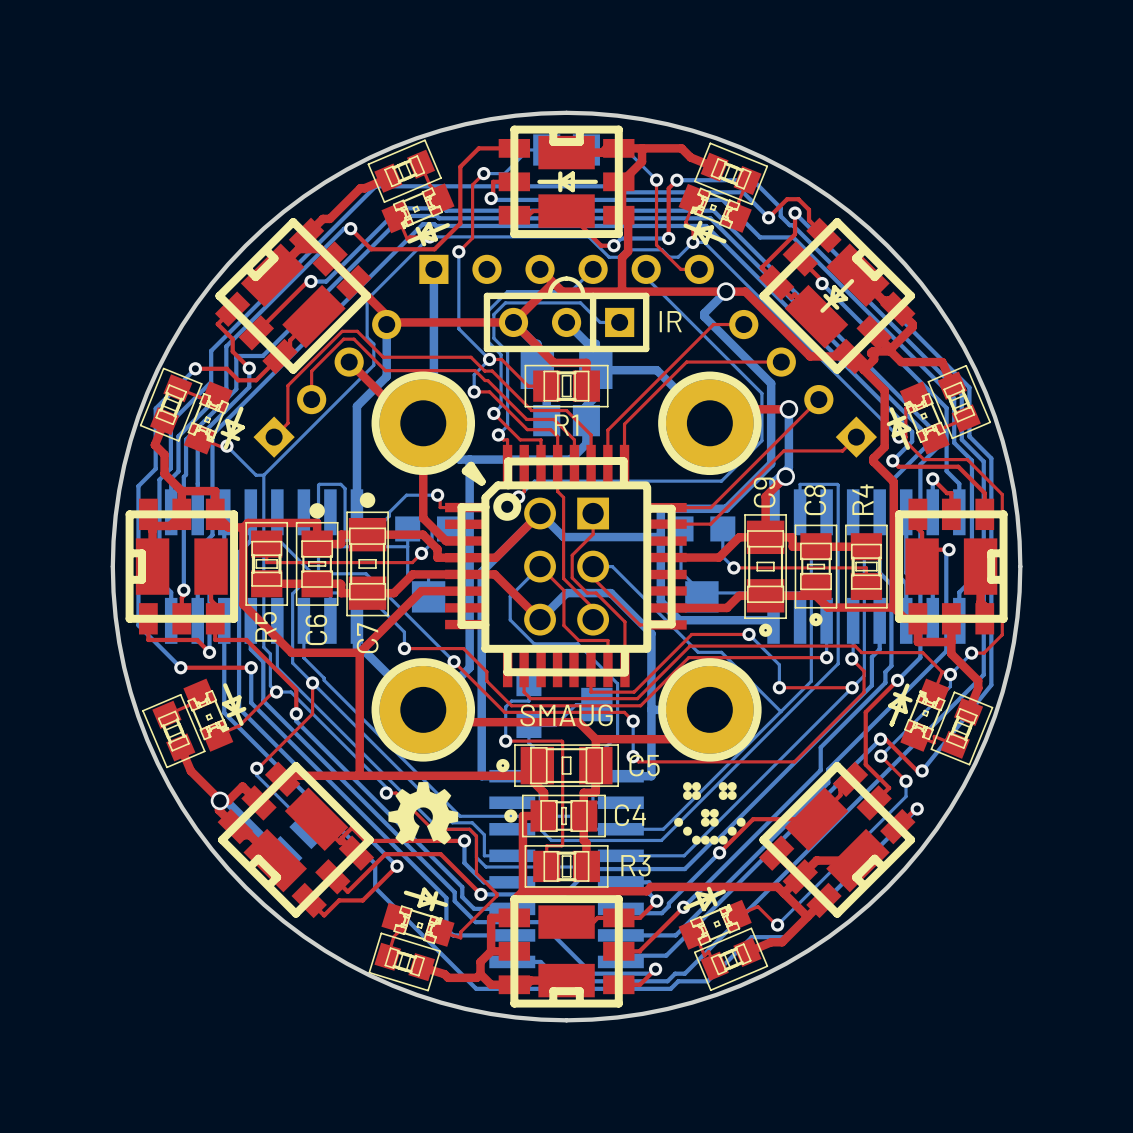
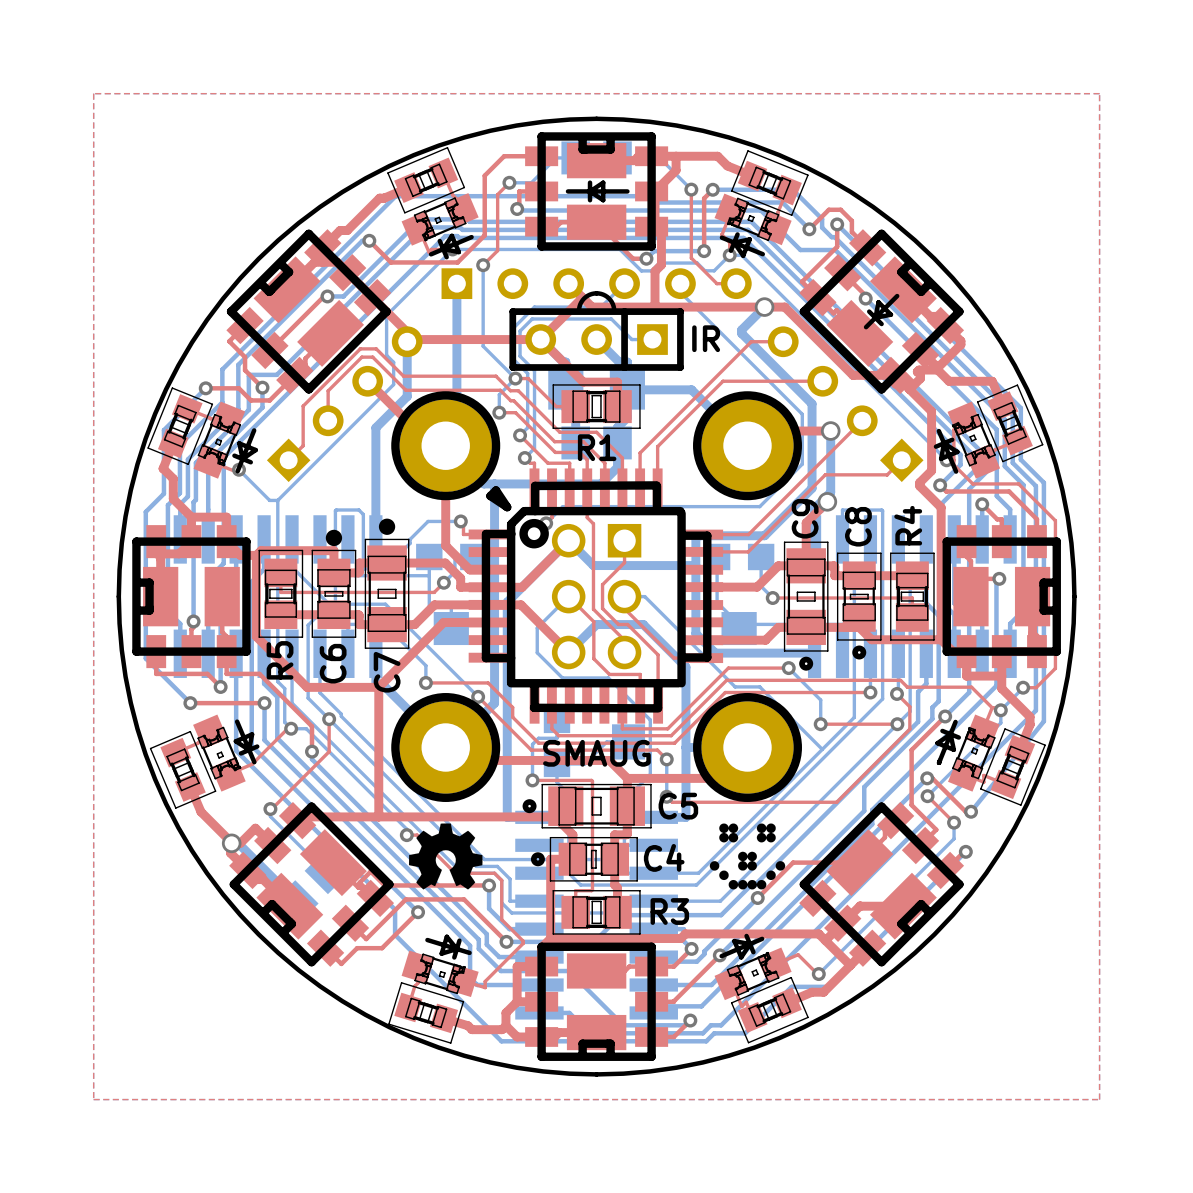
top zone outline: none -> (93, 93) (1099, 93) (1099, 1099) (93, 1099) (93, 93)

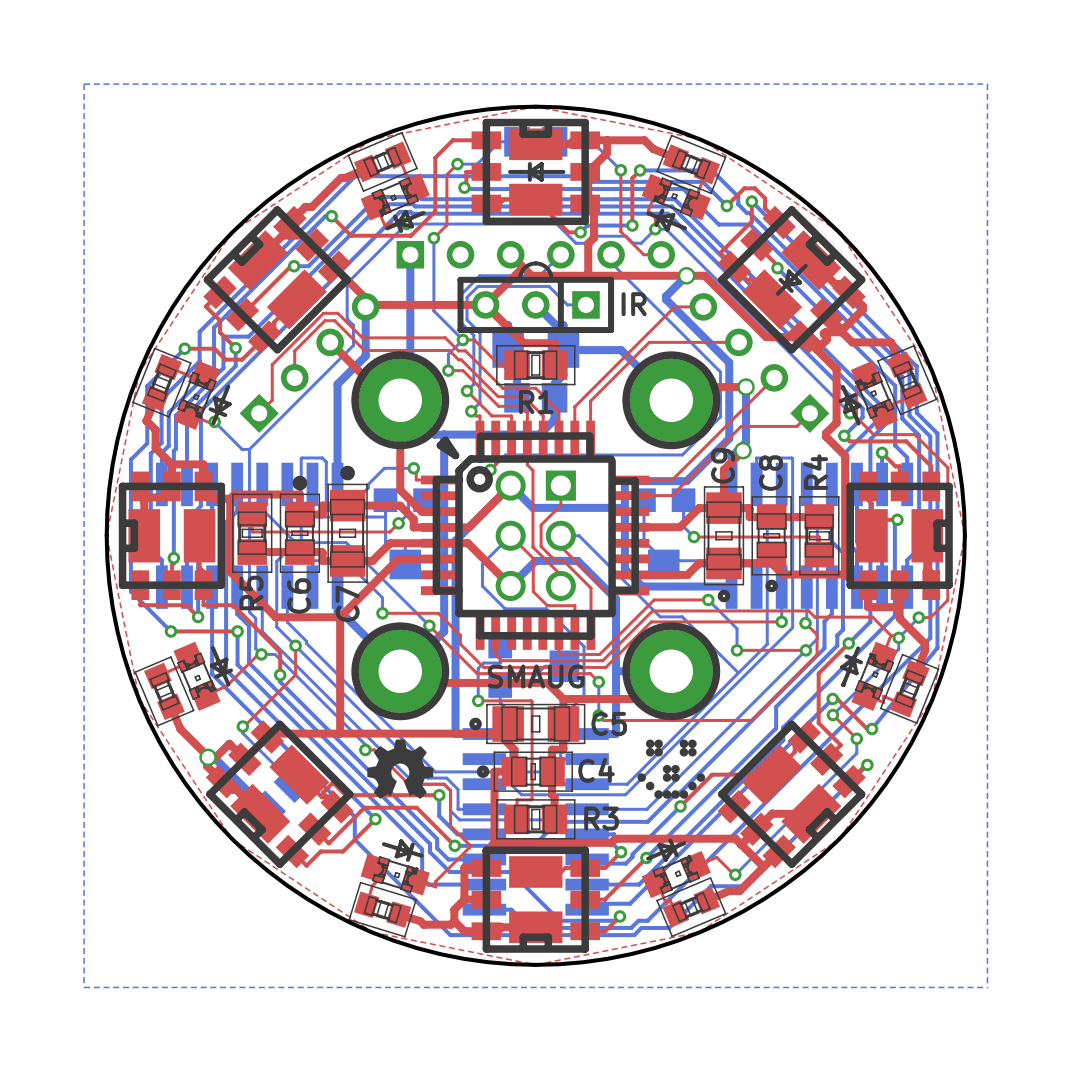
top zone outline: (93, 93) (1099, 93) (1099, 1099) (93, 1099) (93, 93) -> (535, 106) (372, 139) (232, 232) (139, 372) (106, 535) (139, 698) (232, 839) (372, 932) (535, 964) (698, 932) (839, 839) (932, 698) (964, 535) (932, 372) (839, 232) (701, 139) (535, 106)

